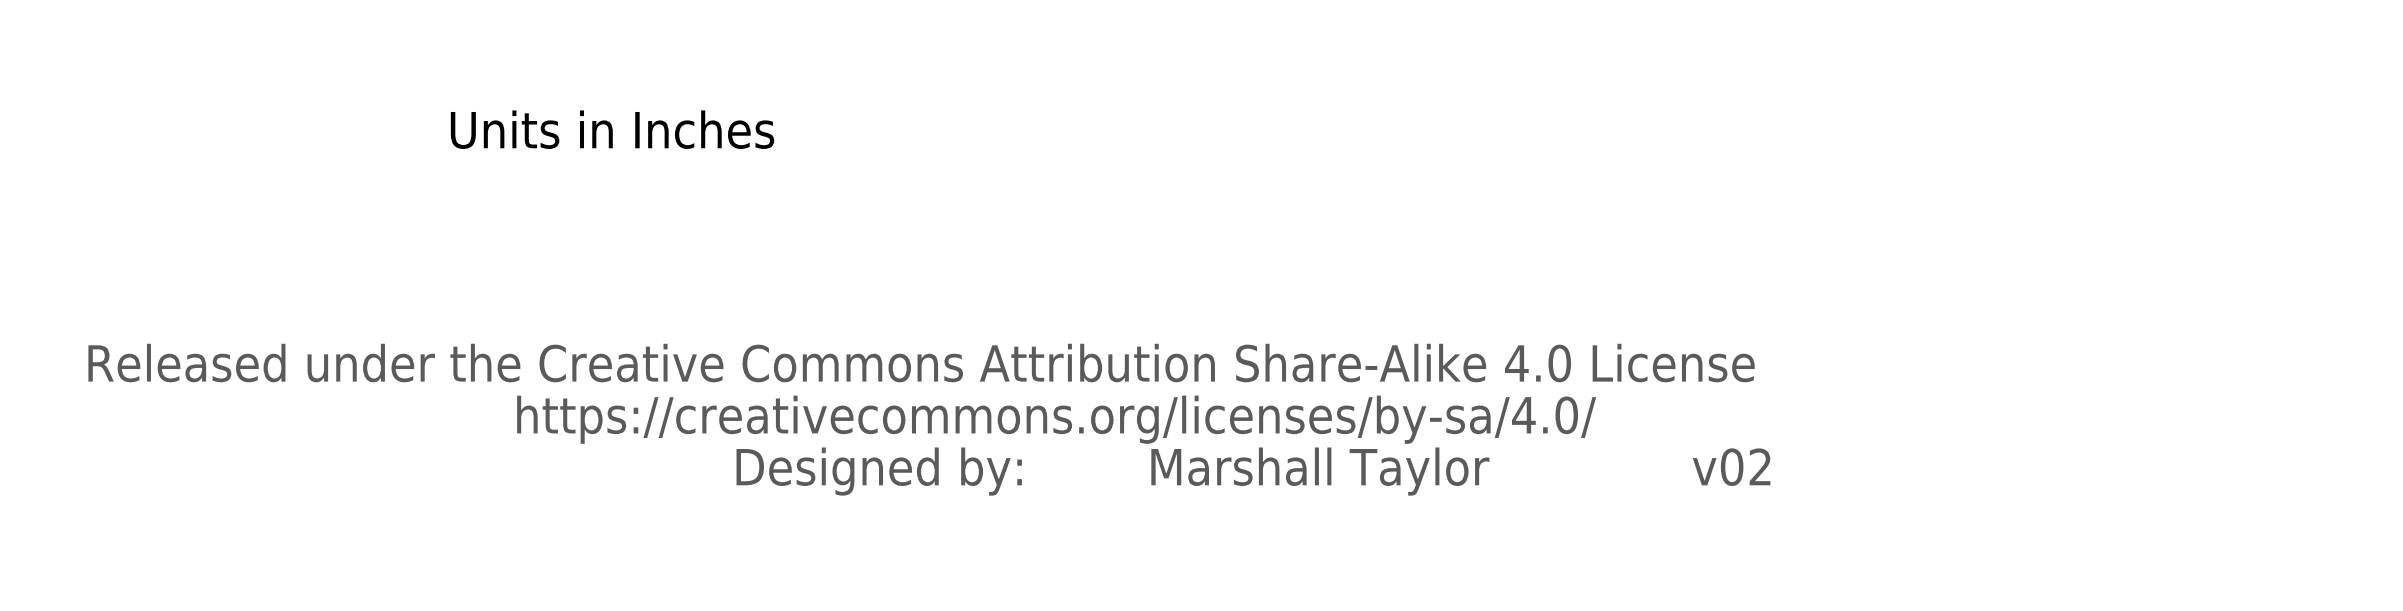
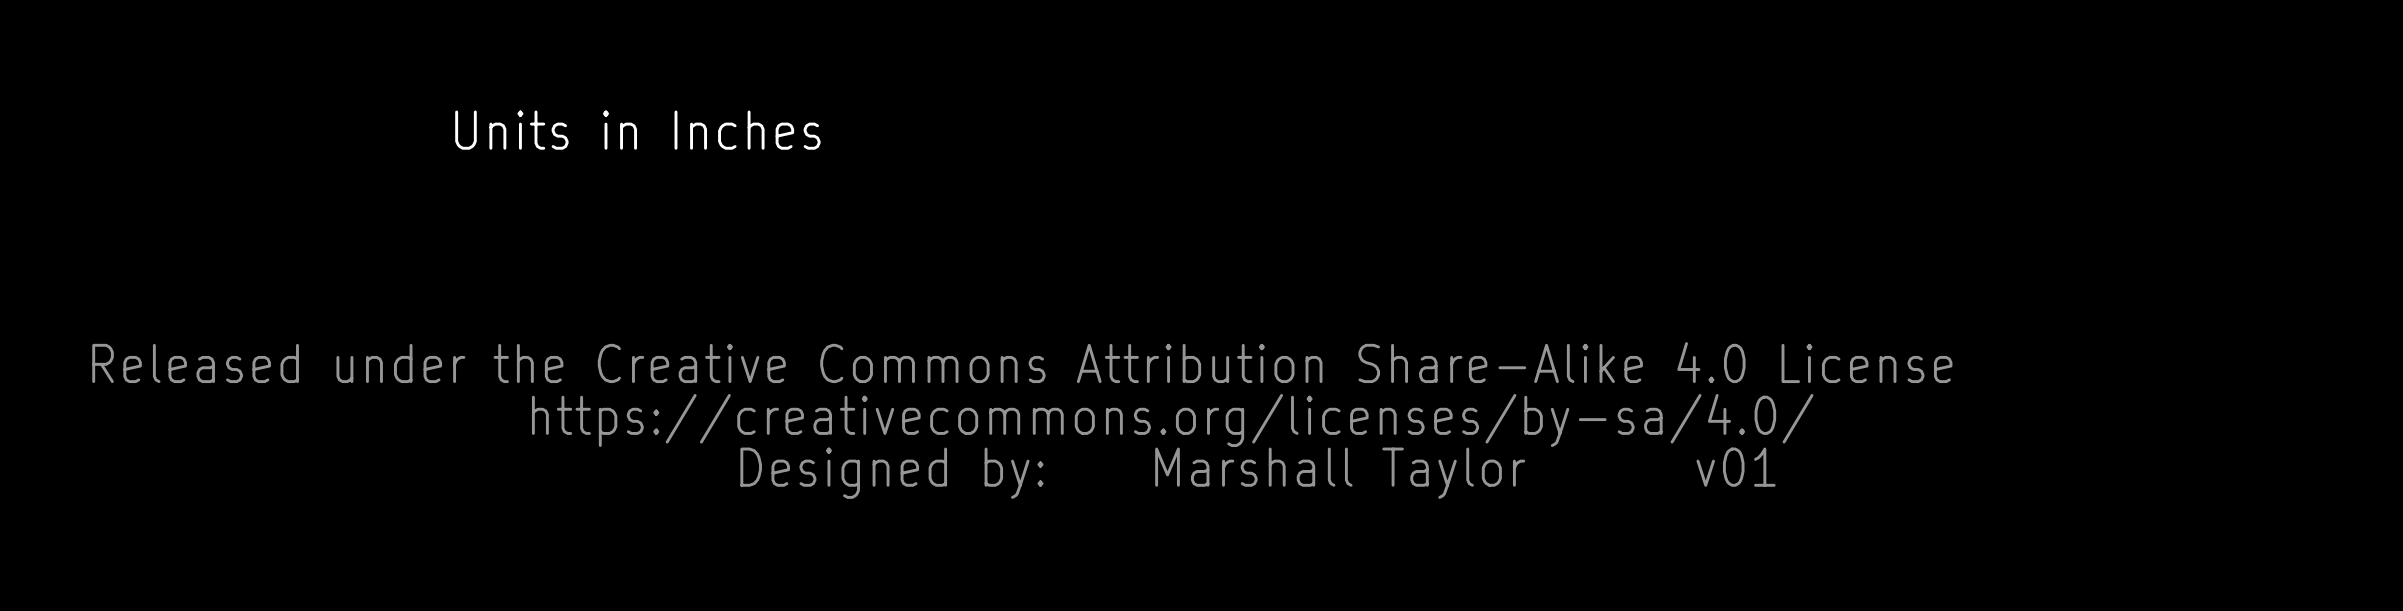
drawing shape: [88, 343, 1771, 496] -> [92, 342, 1953, 499]

